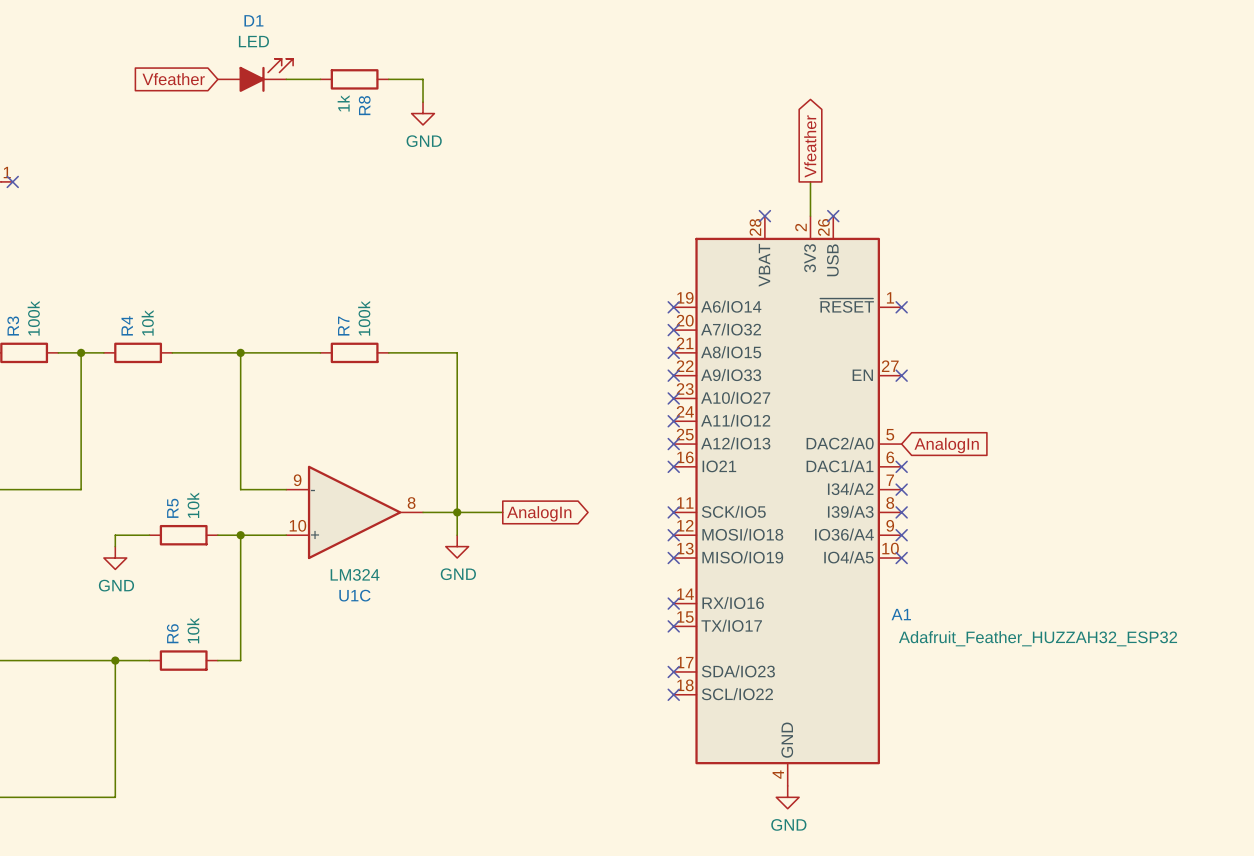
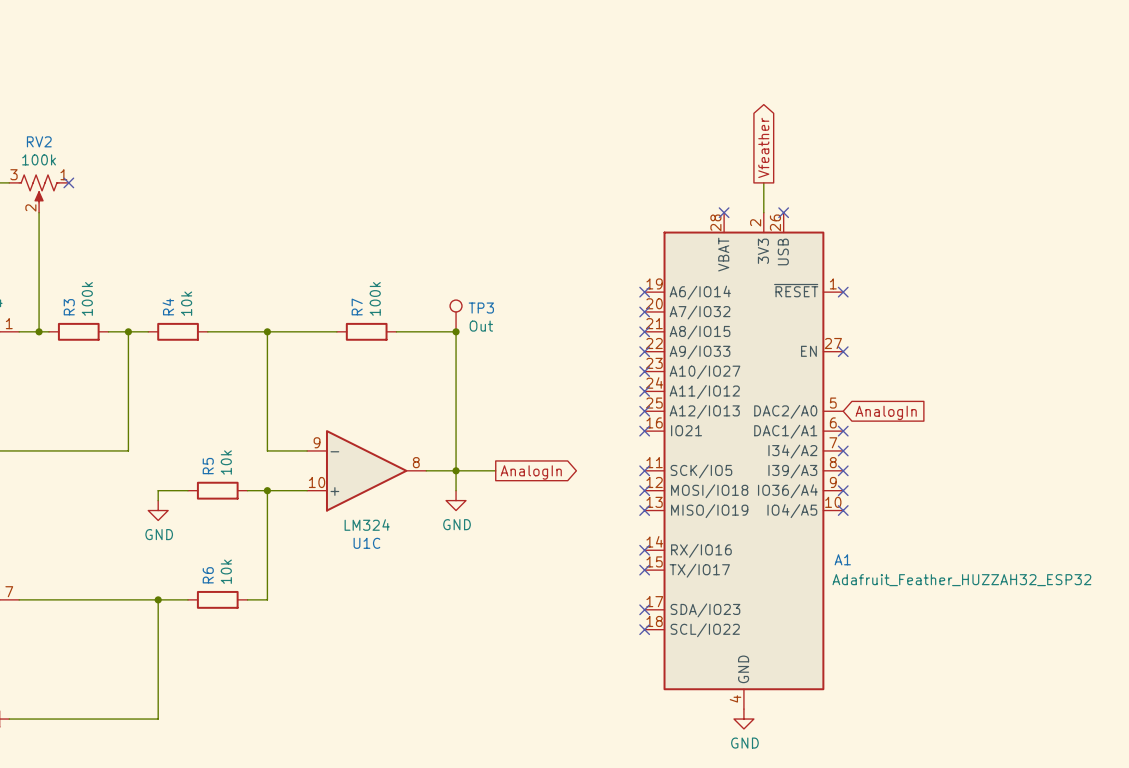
D1: LED (255, 75) -> none
global label: Vfeather (173, 79) -> none
wire: (286, 79) (320, 79) -> none
R8: 1k (354, 79) -> none
wire: (388, 79) (423, 79) (423, 102) -> none
power symbol: GND (423, 113) -> none
TP3: none -> Out (456, 315)
junction: none -> (456, 331)

